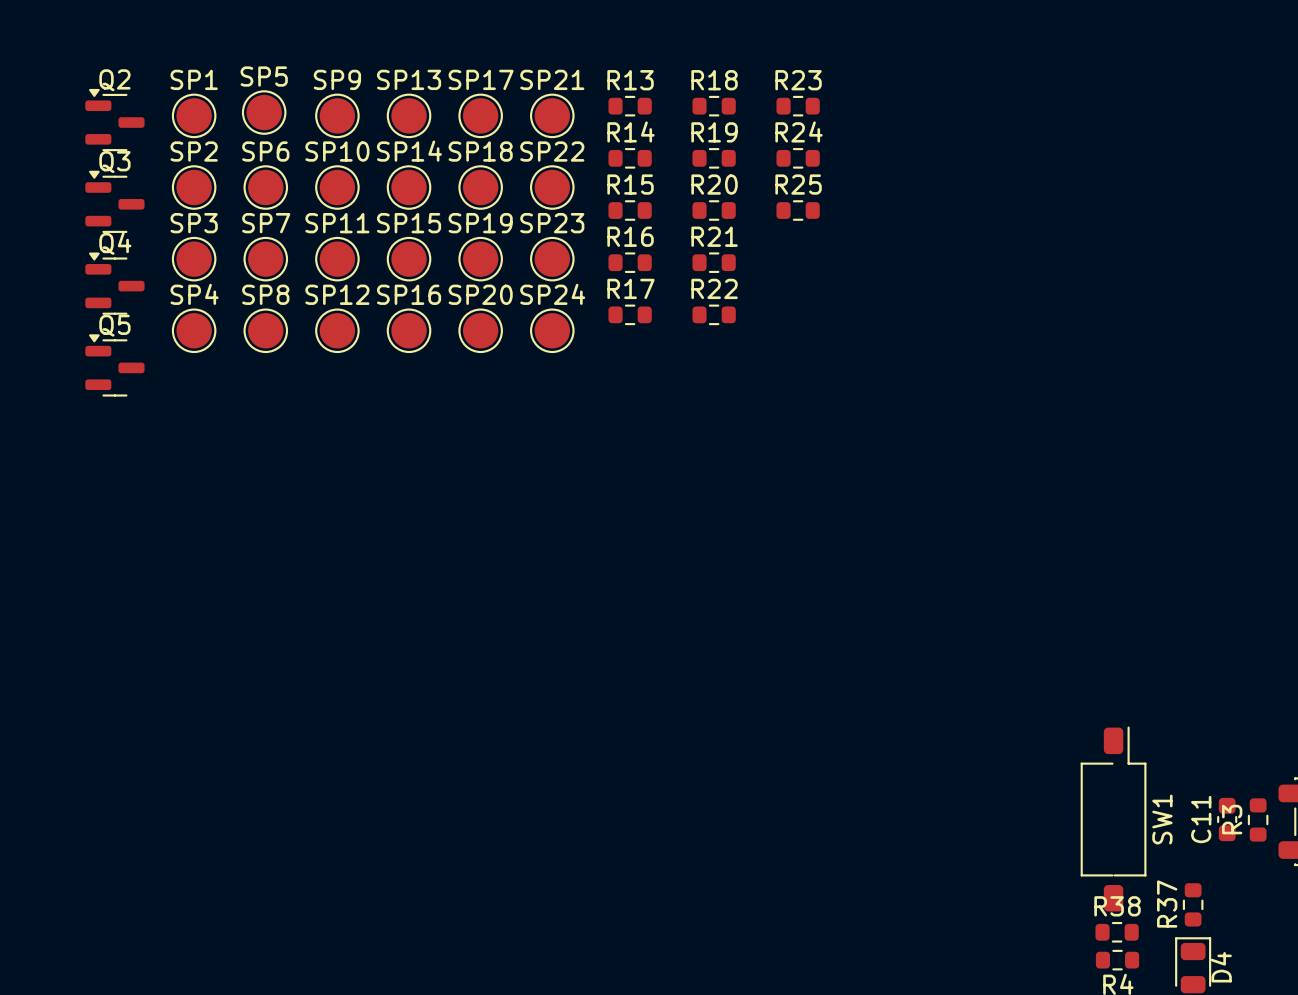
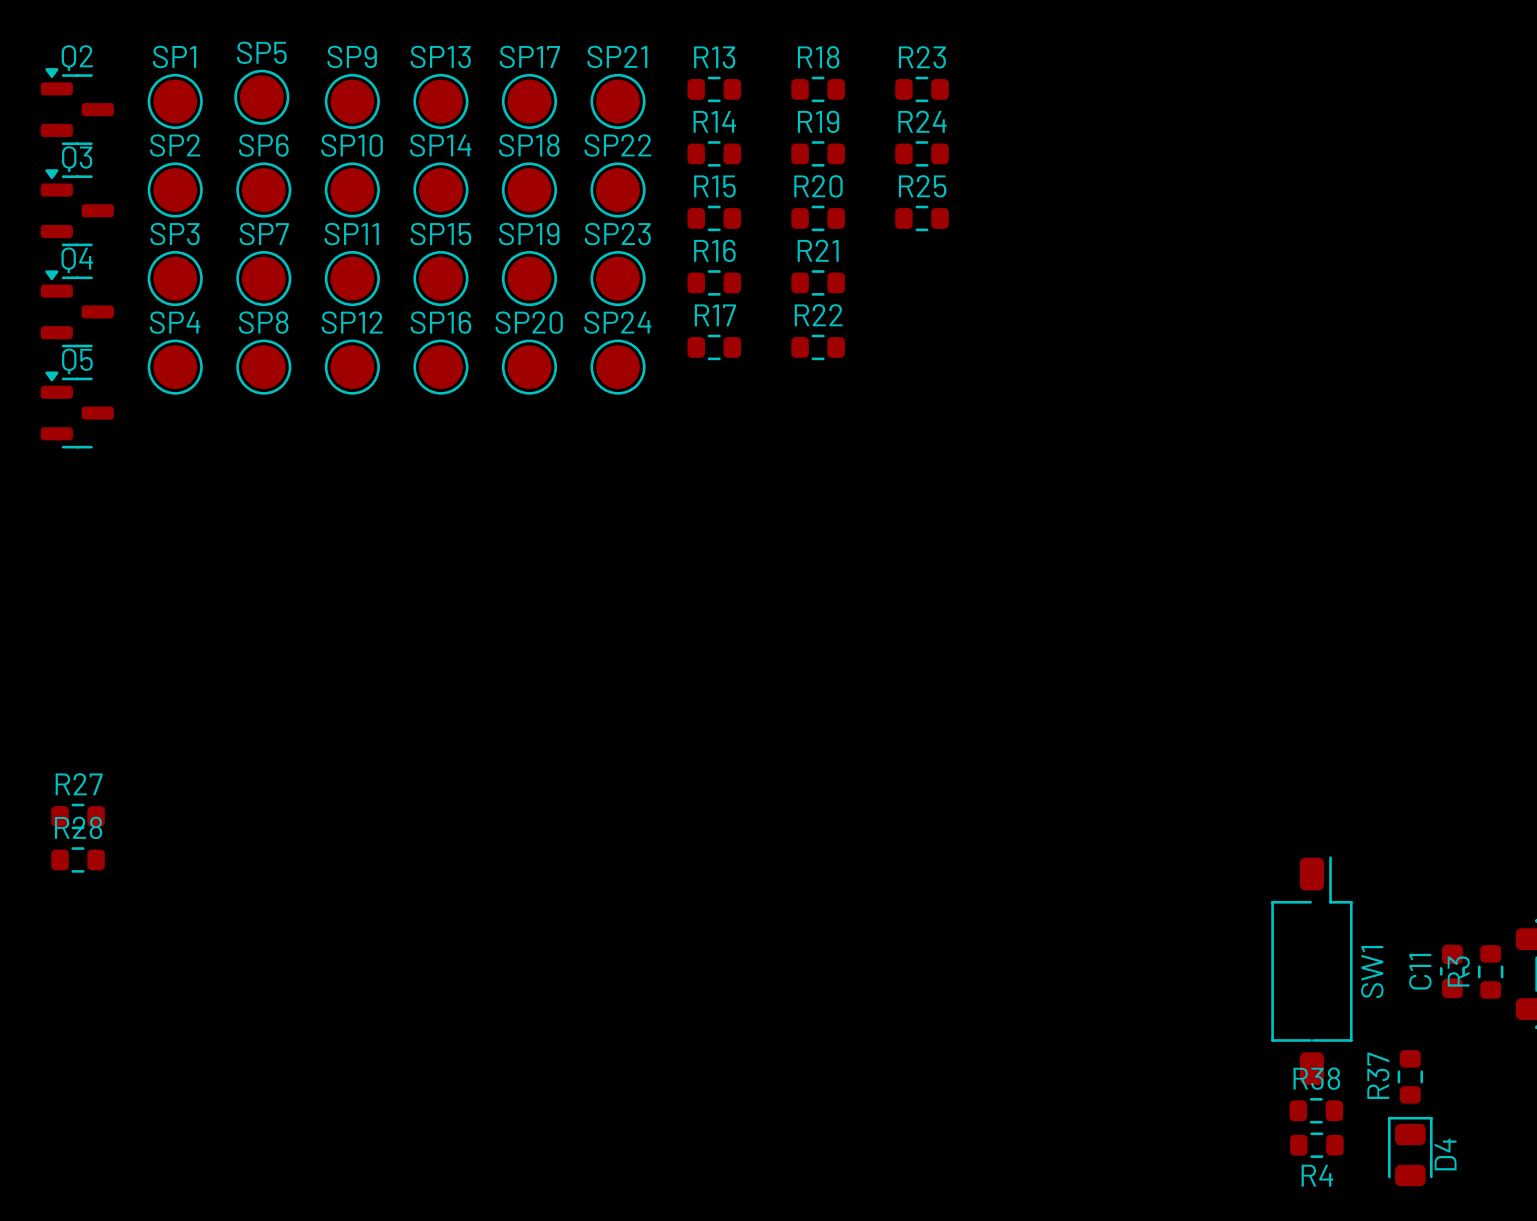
R27: none -> (78, 816)
R28: none -> (78, 859)

